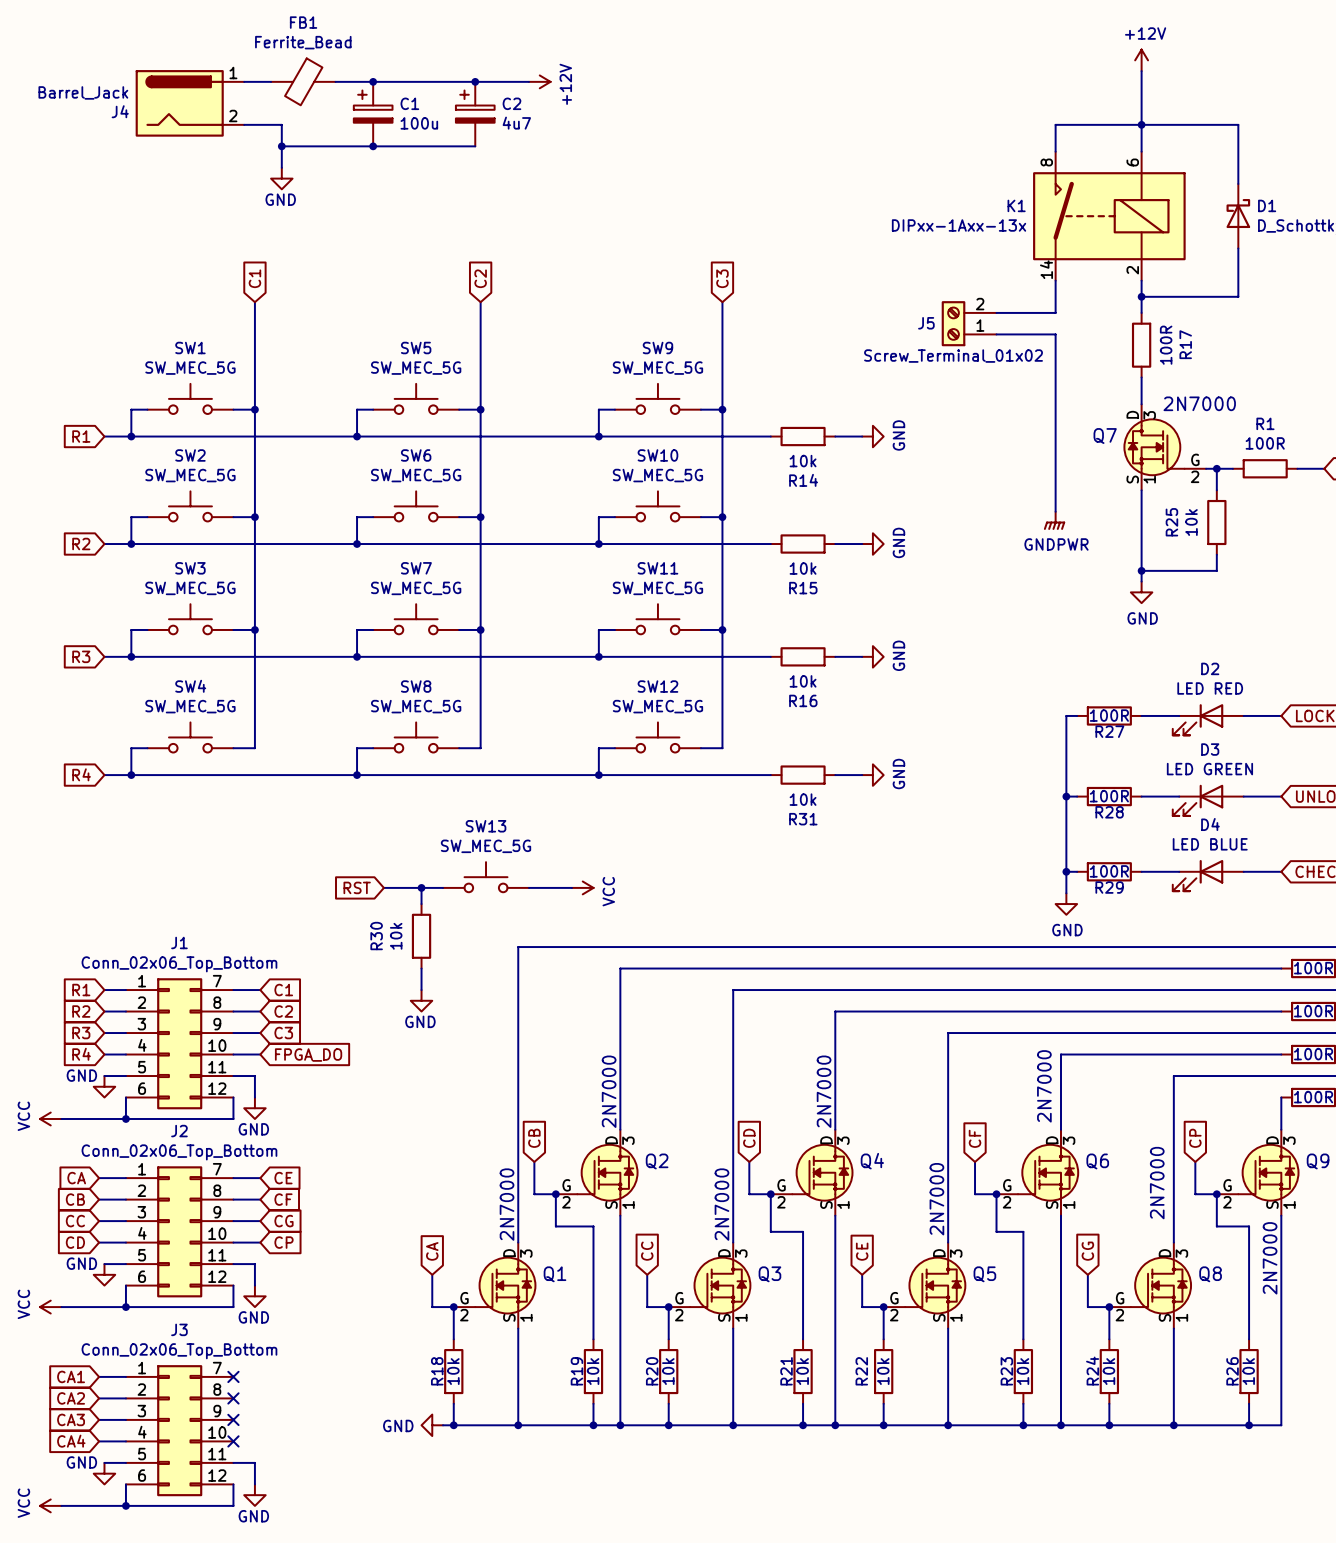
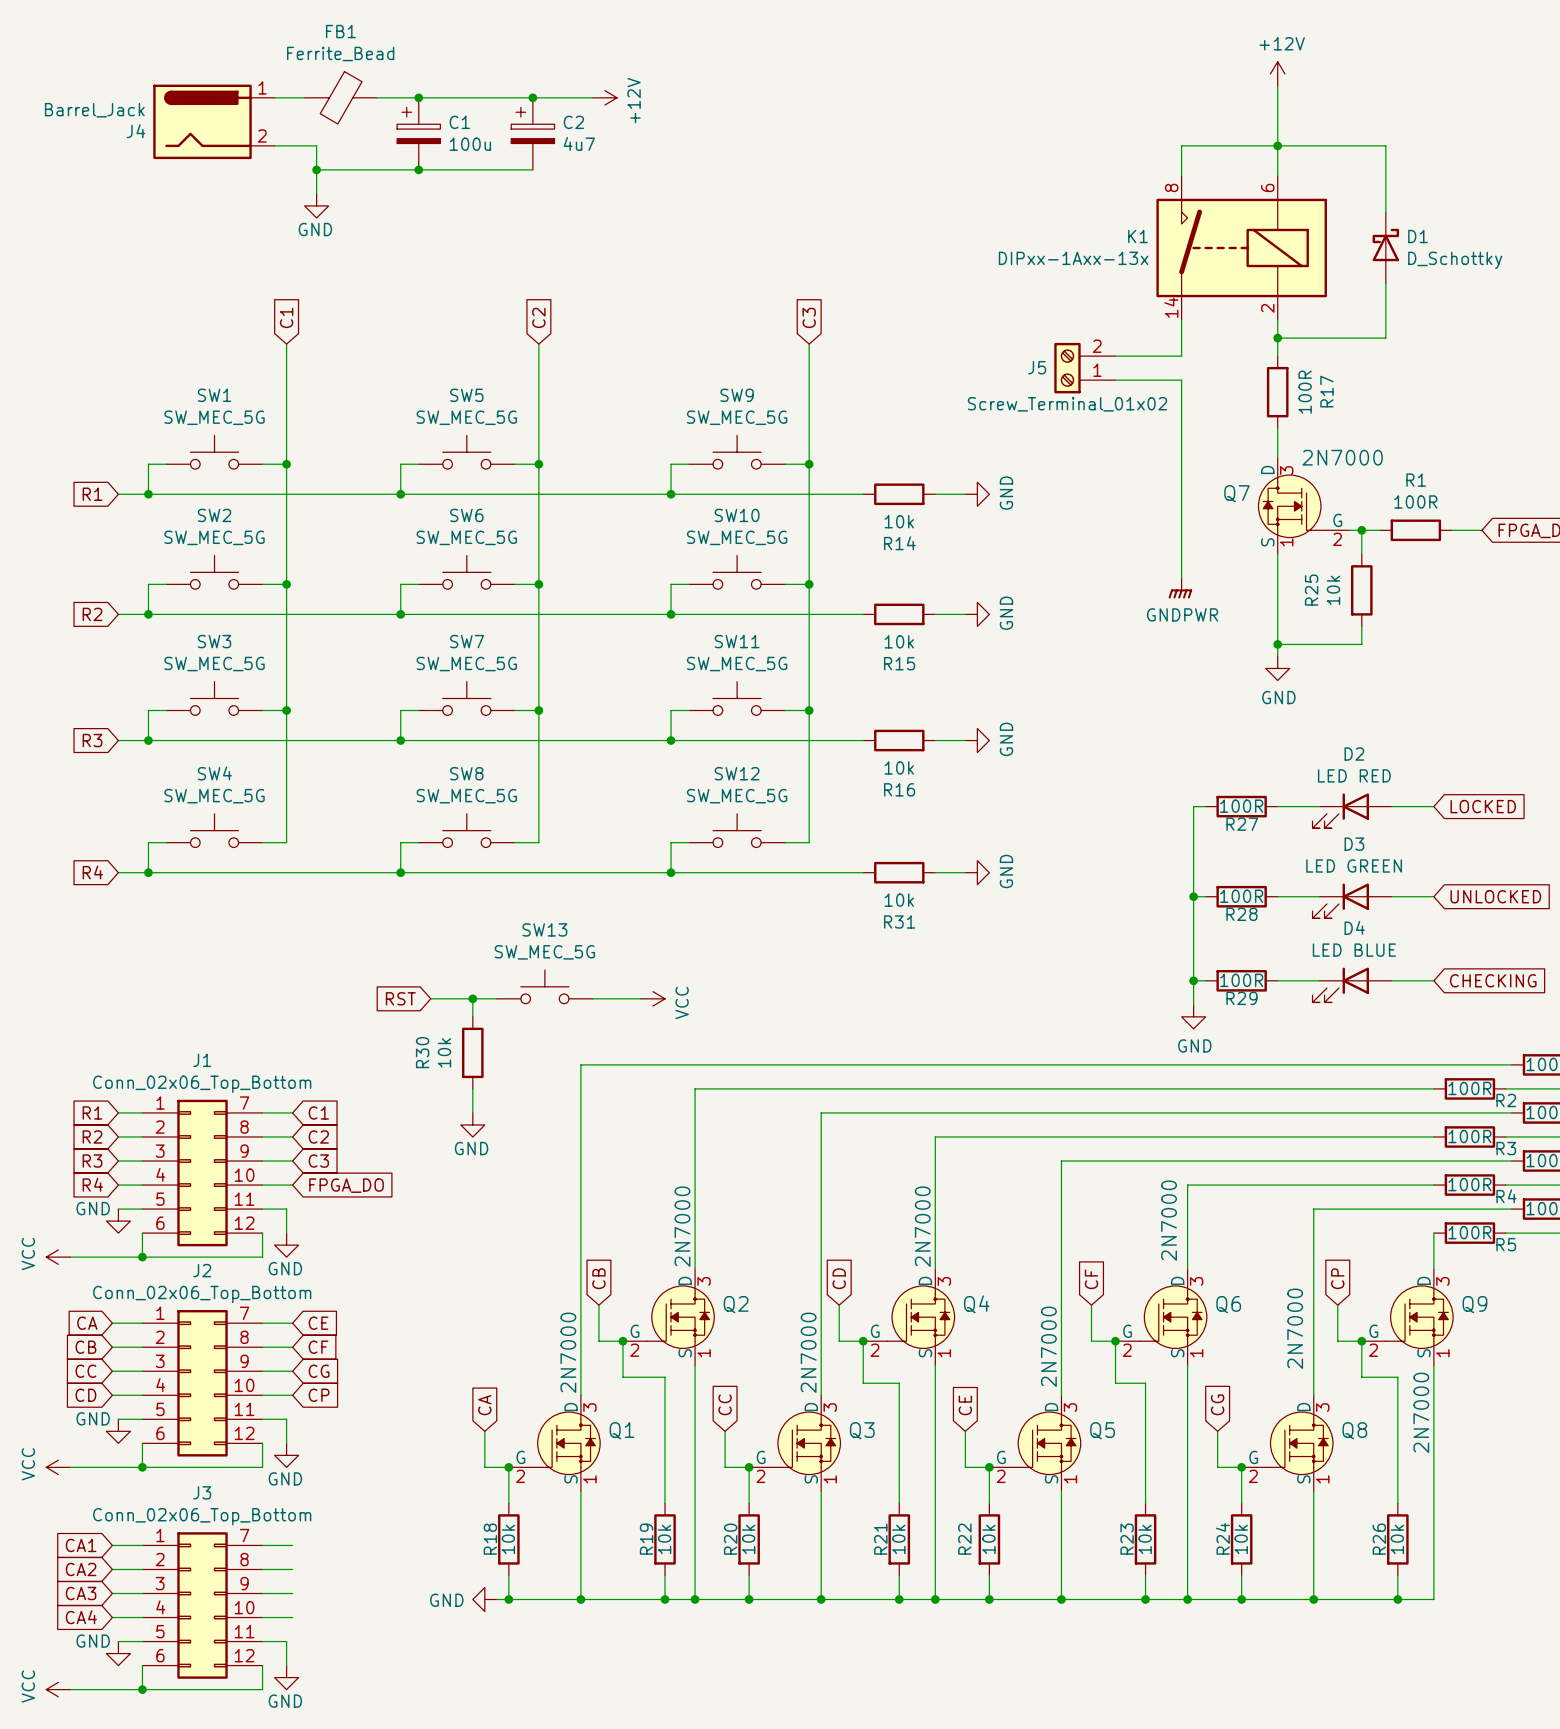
wire: none -> (262, 1545) (292, 1545)
no-connect mark: (233, 1376) -> none
wire: none -> (262, 1569) (292, 1569)
no-connect mark: (233, 1398) -> none
wire: none -> (262, 1593) (292, 1593)
no-connect mark: (233, 1419) -> none
wire: none -> (262, 1617) (292, 1617)
no-connect mark: (233, 1441) -> none

